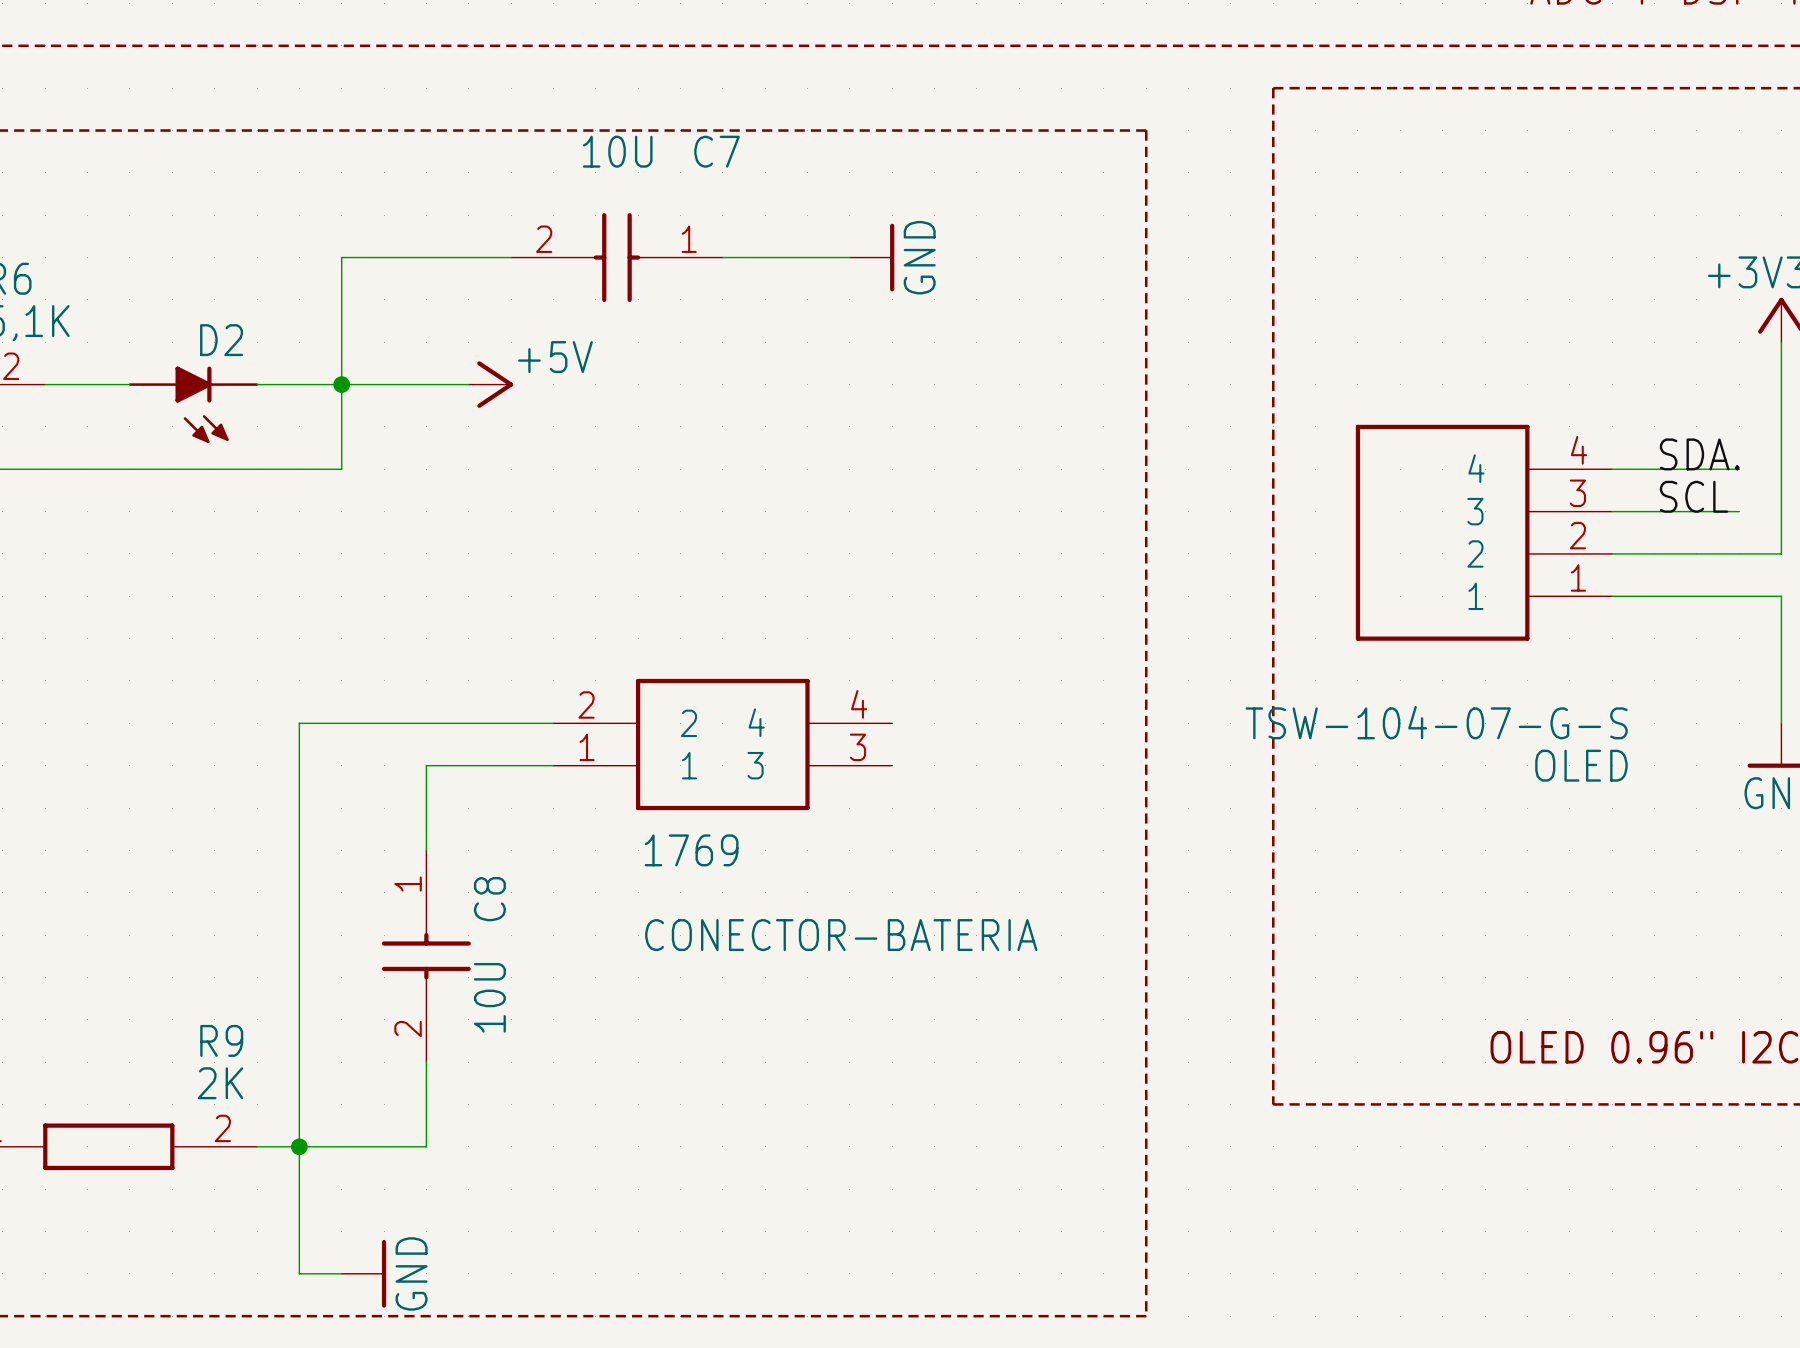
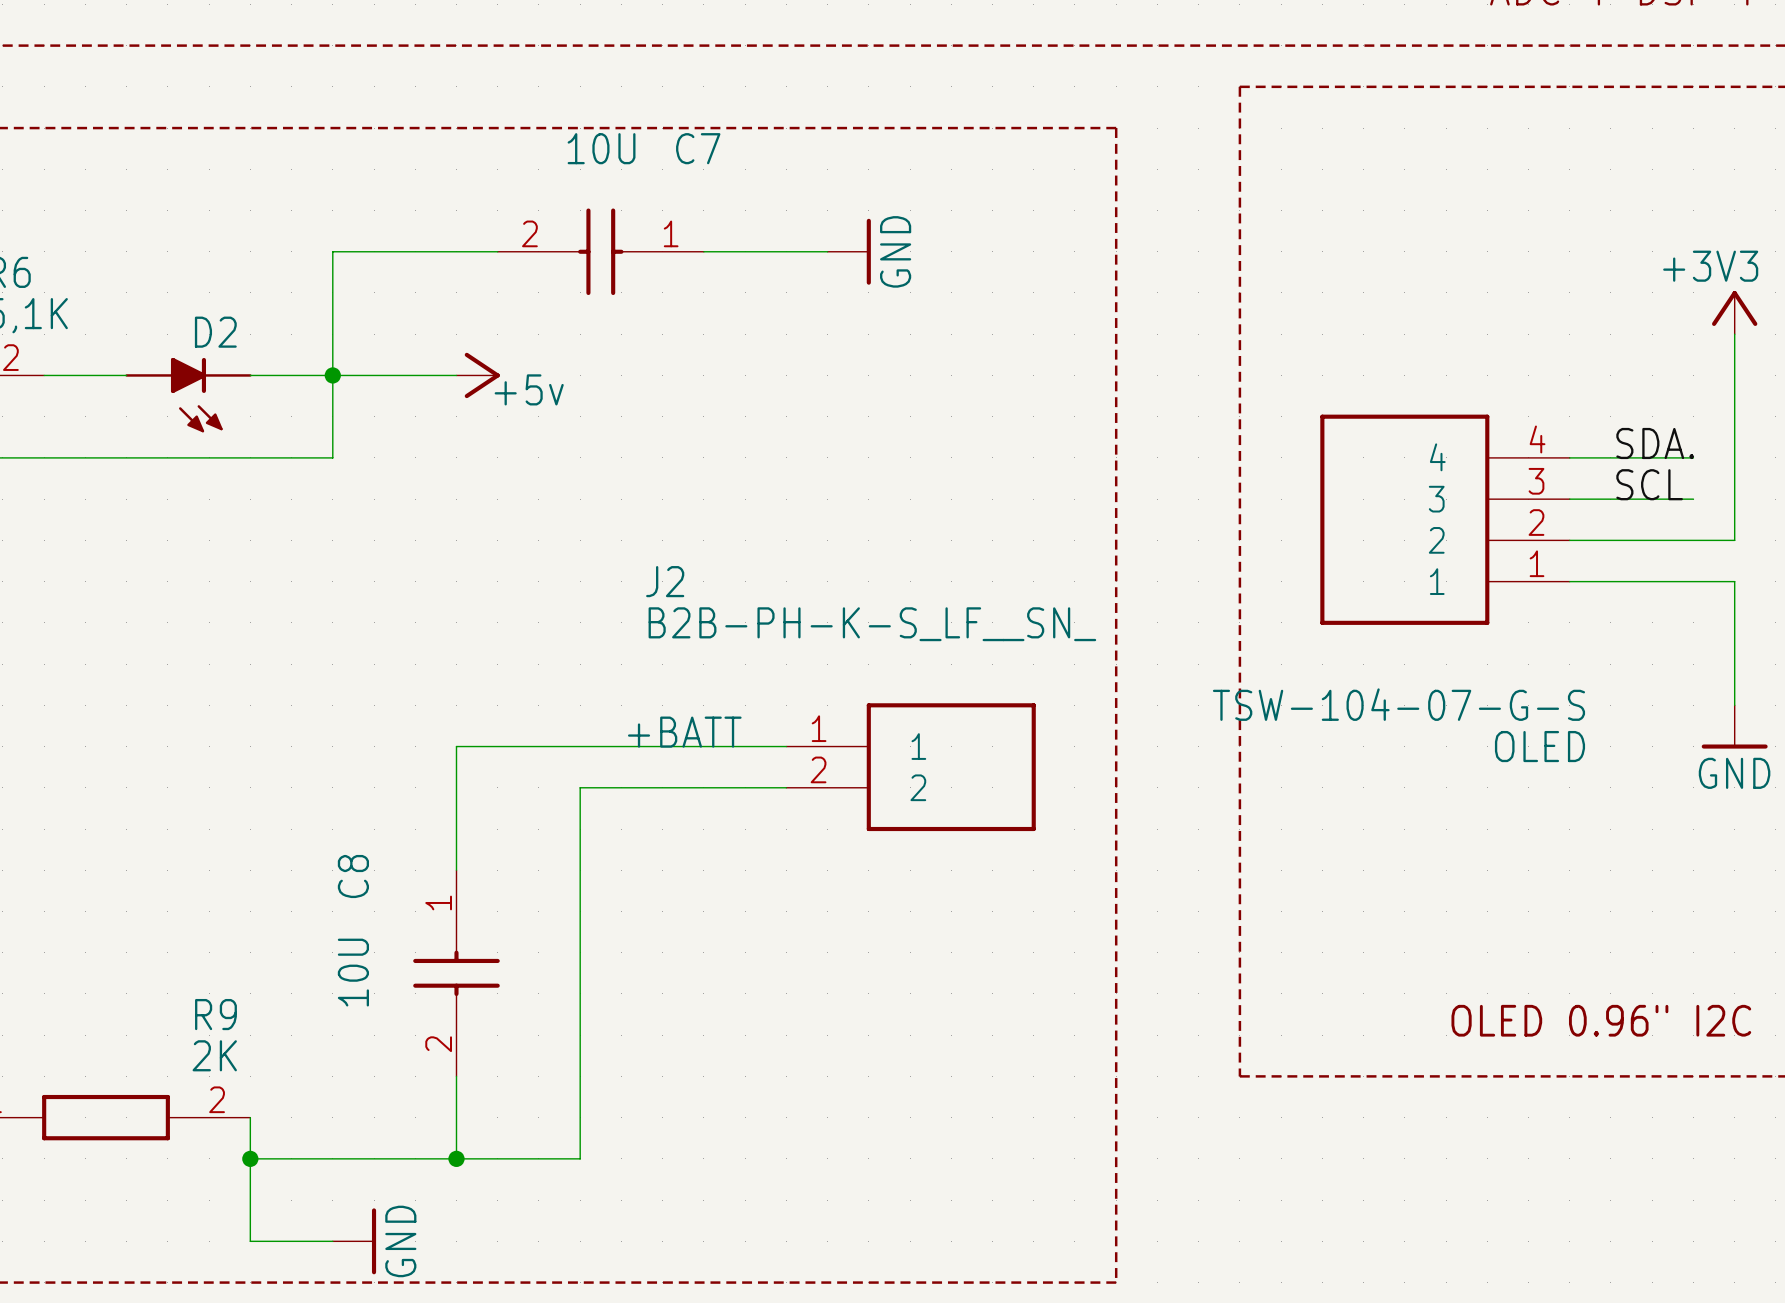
power symbol: +5V (490, 384) -> +5v (478, 375)
wire: (553, 723) (299, 723) (299, 1273) -> none
CONECTOR-BATERIA: 1769 (722, 744) -> none
text: none -> +BATT (684, 732)
wire: (468, 765) (426, 765) (426, 850) -> (456, 746) (456, 870)
wire: none -> (538, 746) (786, 746)
J2: none -> B2B-PH-K-S_LF__SN_ (911, 767)
wire: none -> (786, 787) (580, 787) (580, 1158) (250, 1158)
C8 name position: C8 (489, 899) -> C8 (353, 876)
C8 position: (426, 956) -> (456, 973)
C8 value position: 10U (489, 997) -> 10U (353, 972)
wire: (426, 1062) (426, 1146) (257, 1146) -> (291, 1241) (250, 1241) (250, 1117)
wire: none -> (456, 1076) (456, 1158)
junction position: (299, 1146) -> (250, 1158)
junction: none -> (456, 1158)

